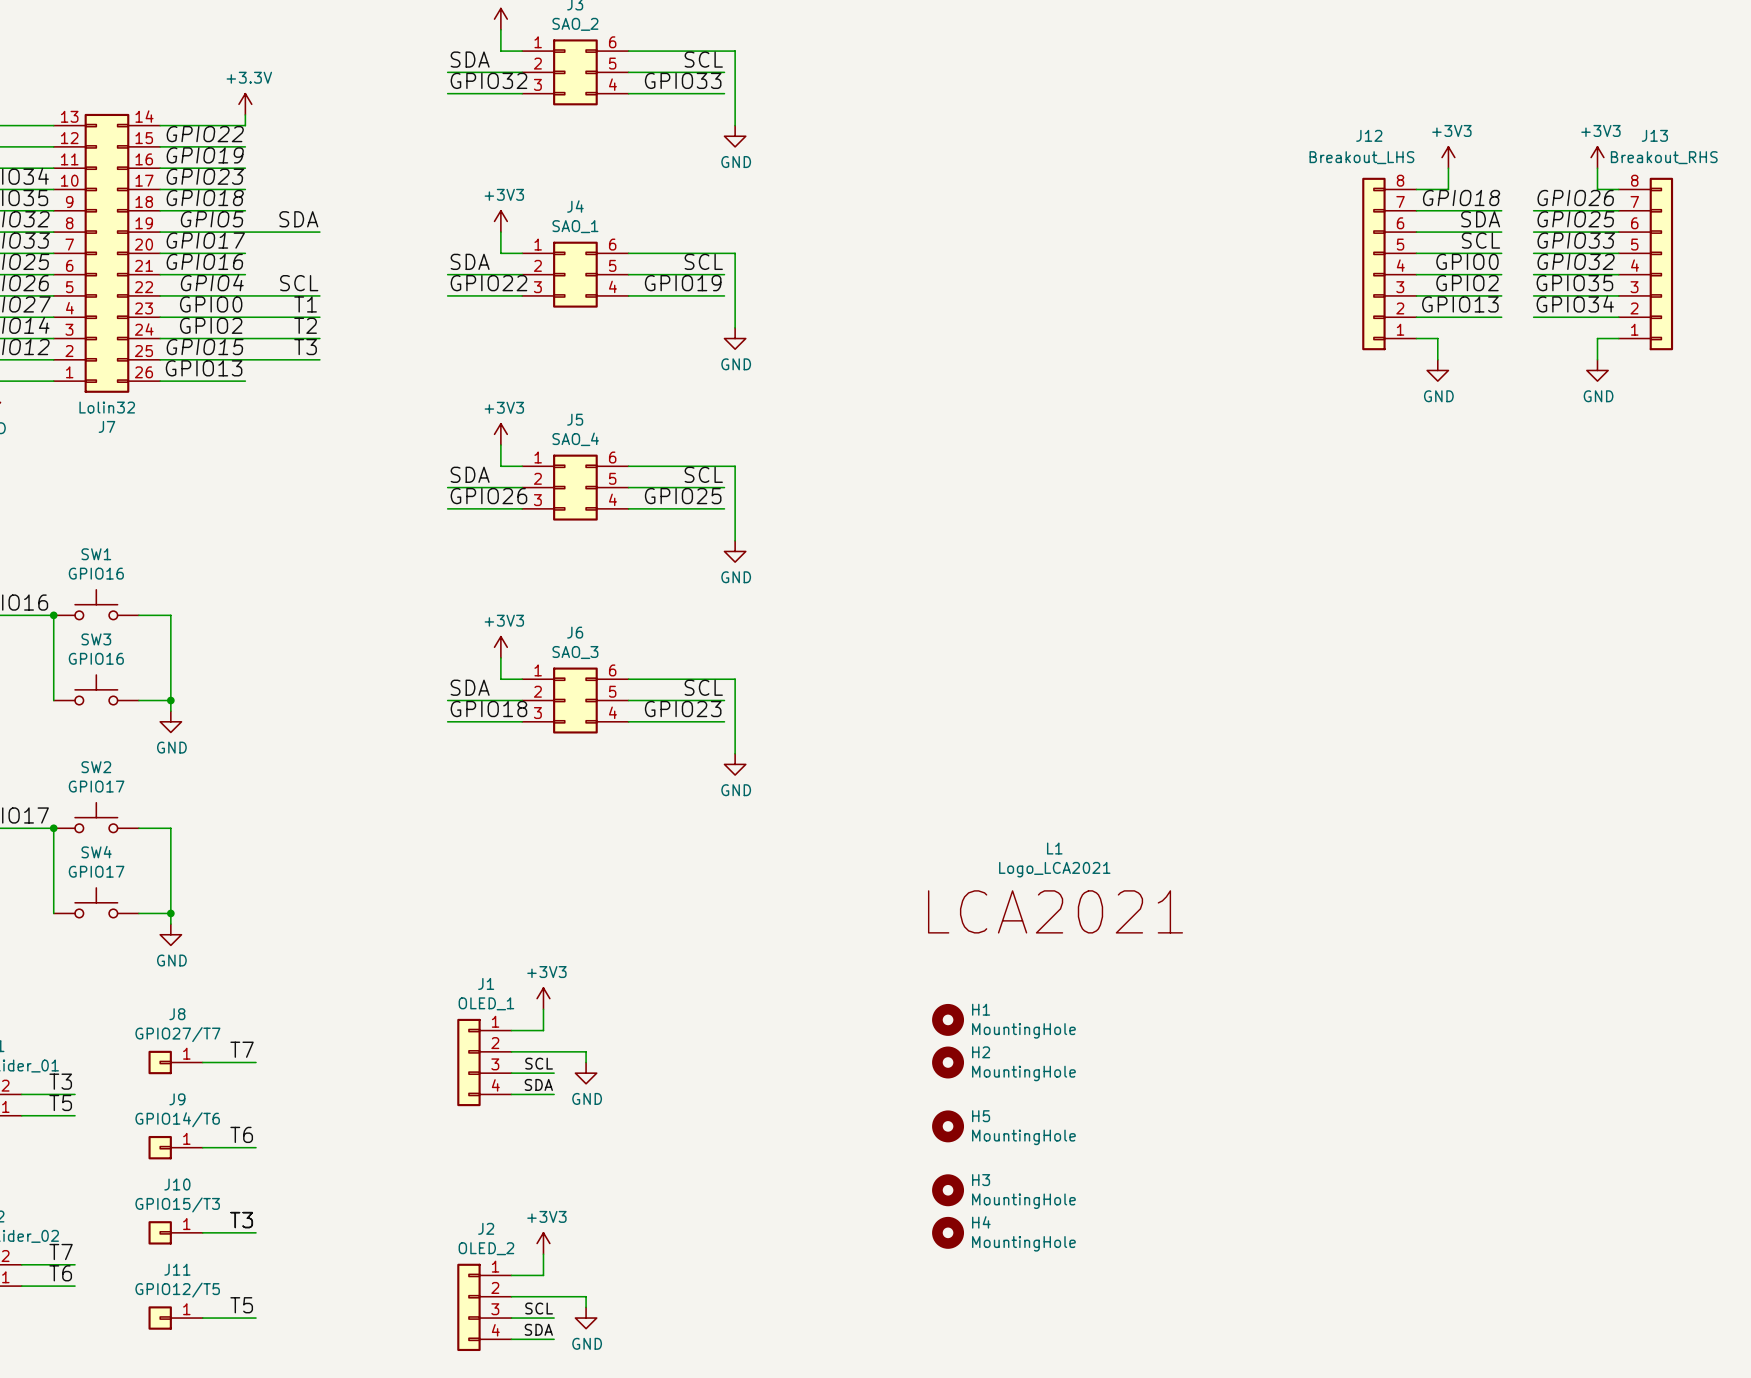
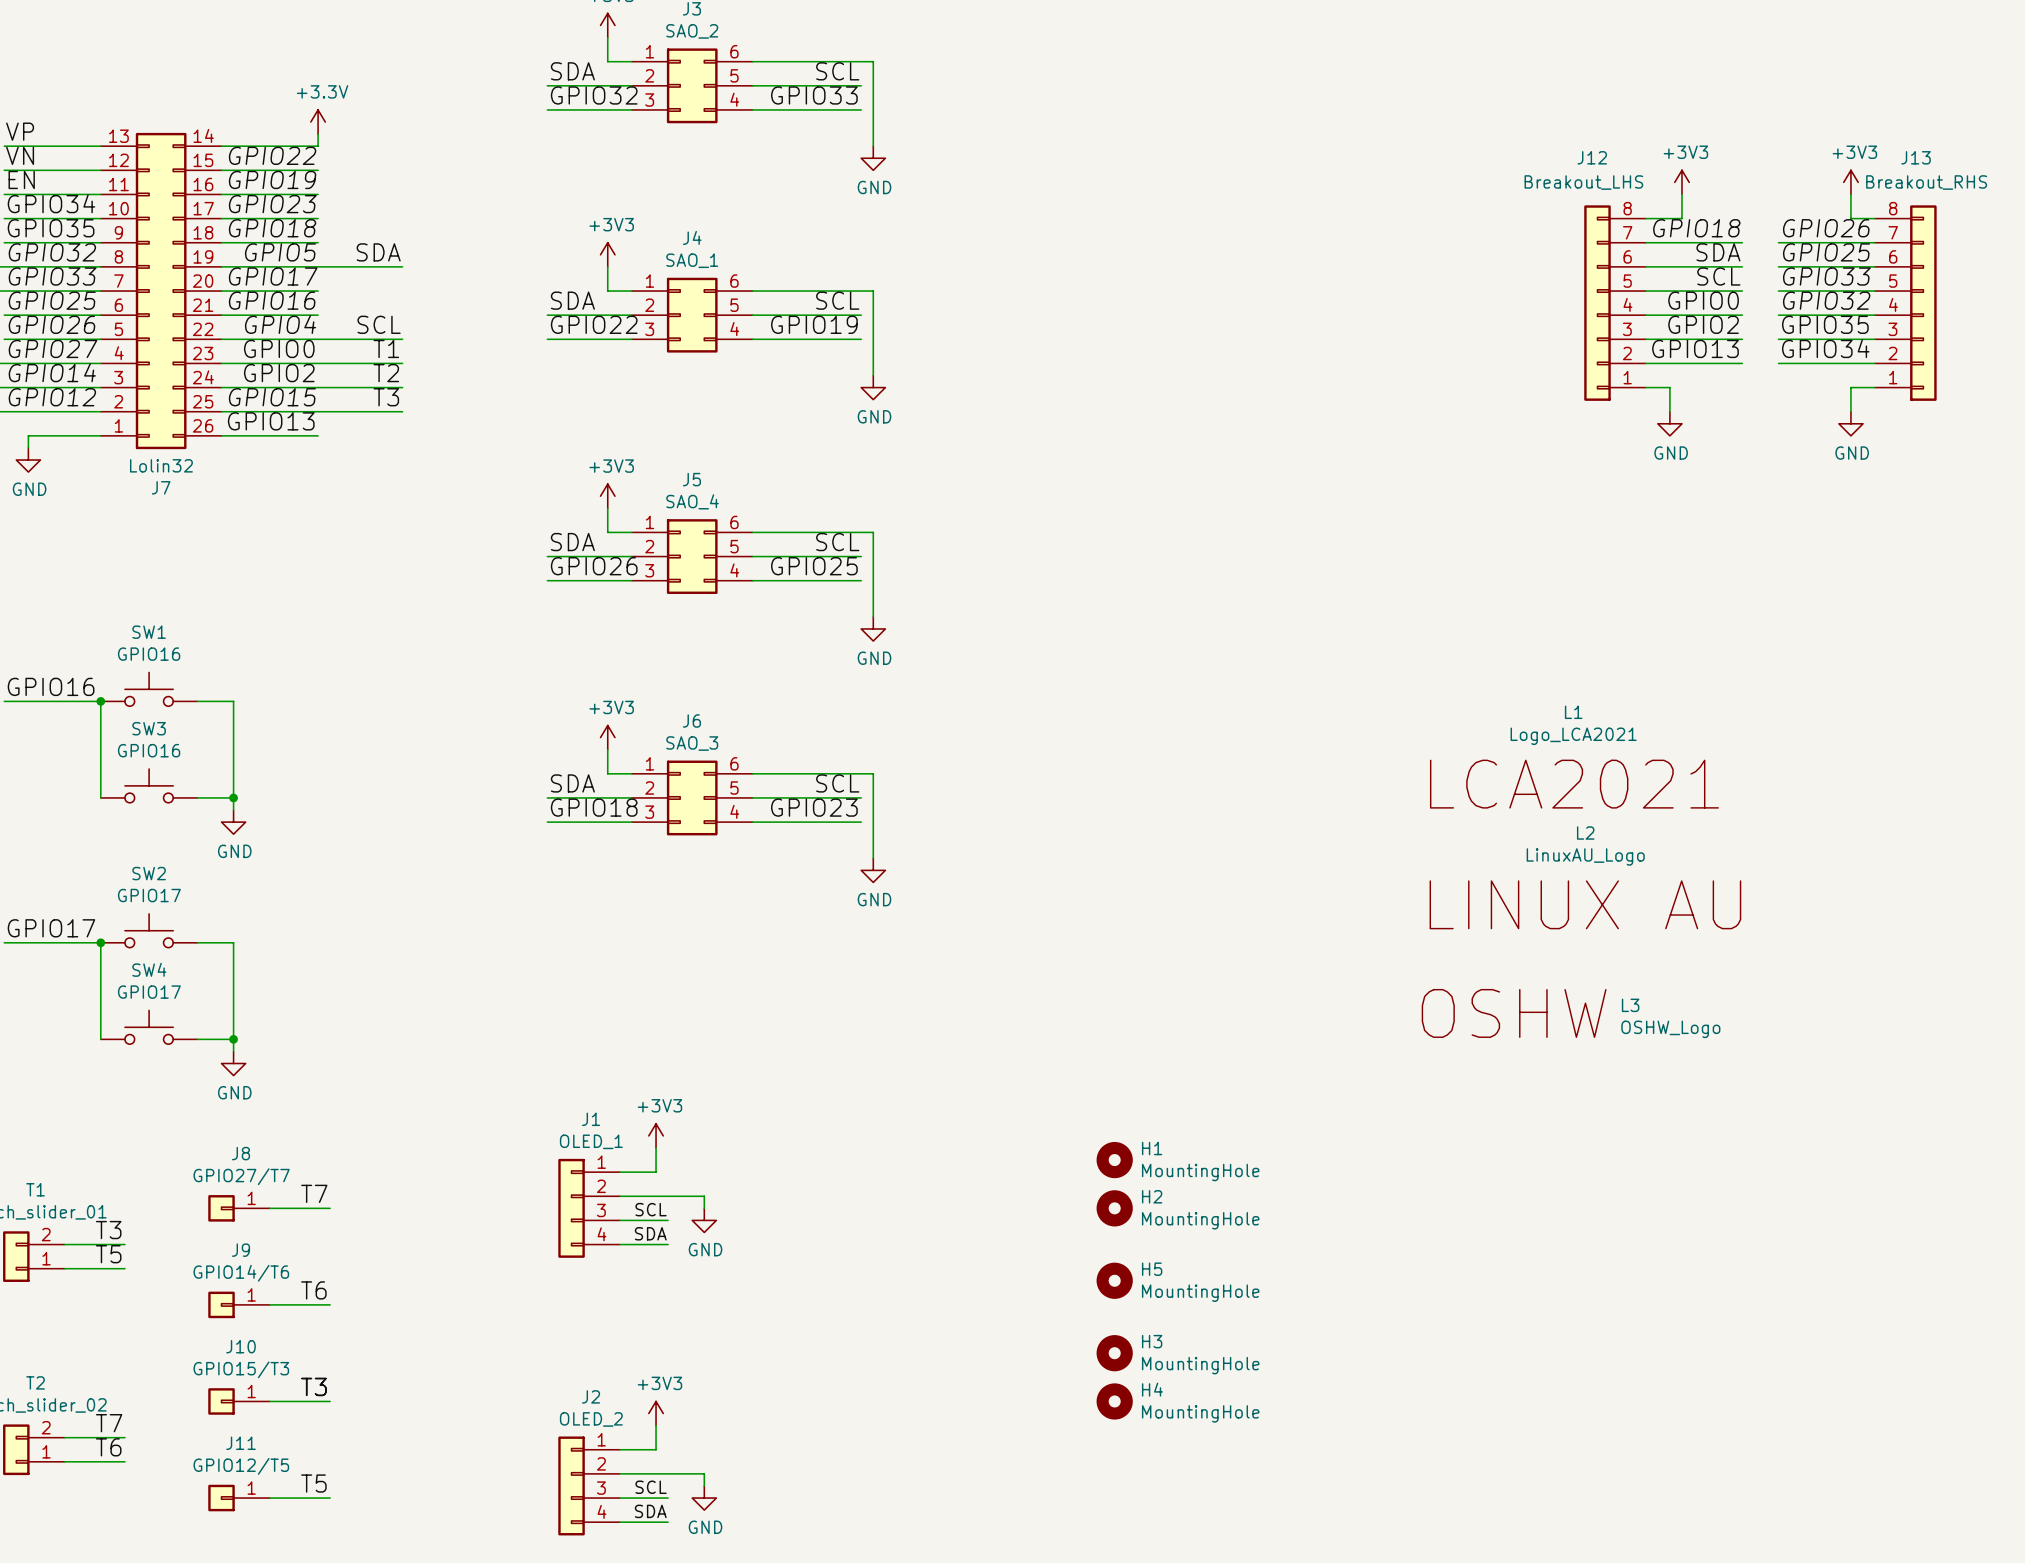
L2: none -> LinuxAU_Logo (1585, 877)
L1 position: (1055, 888) -> (1574, 757)
L3: none -> OSHW_Logo (1571, 1013)

